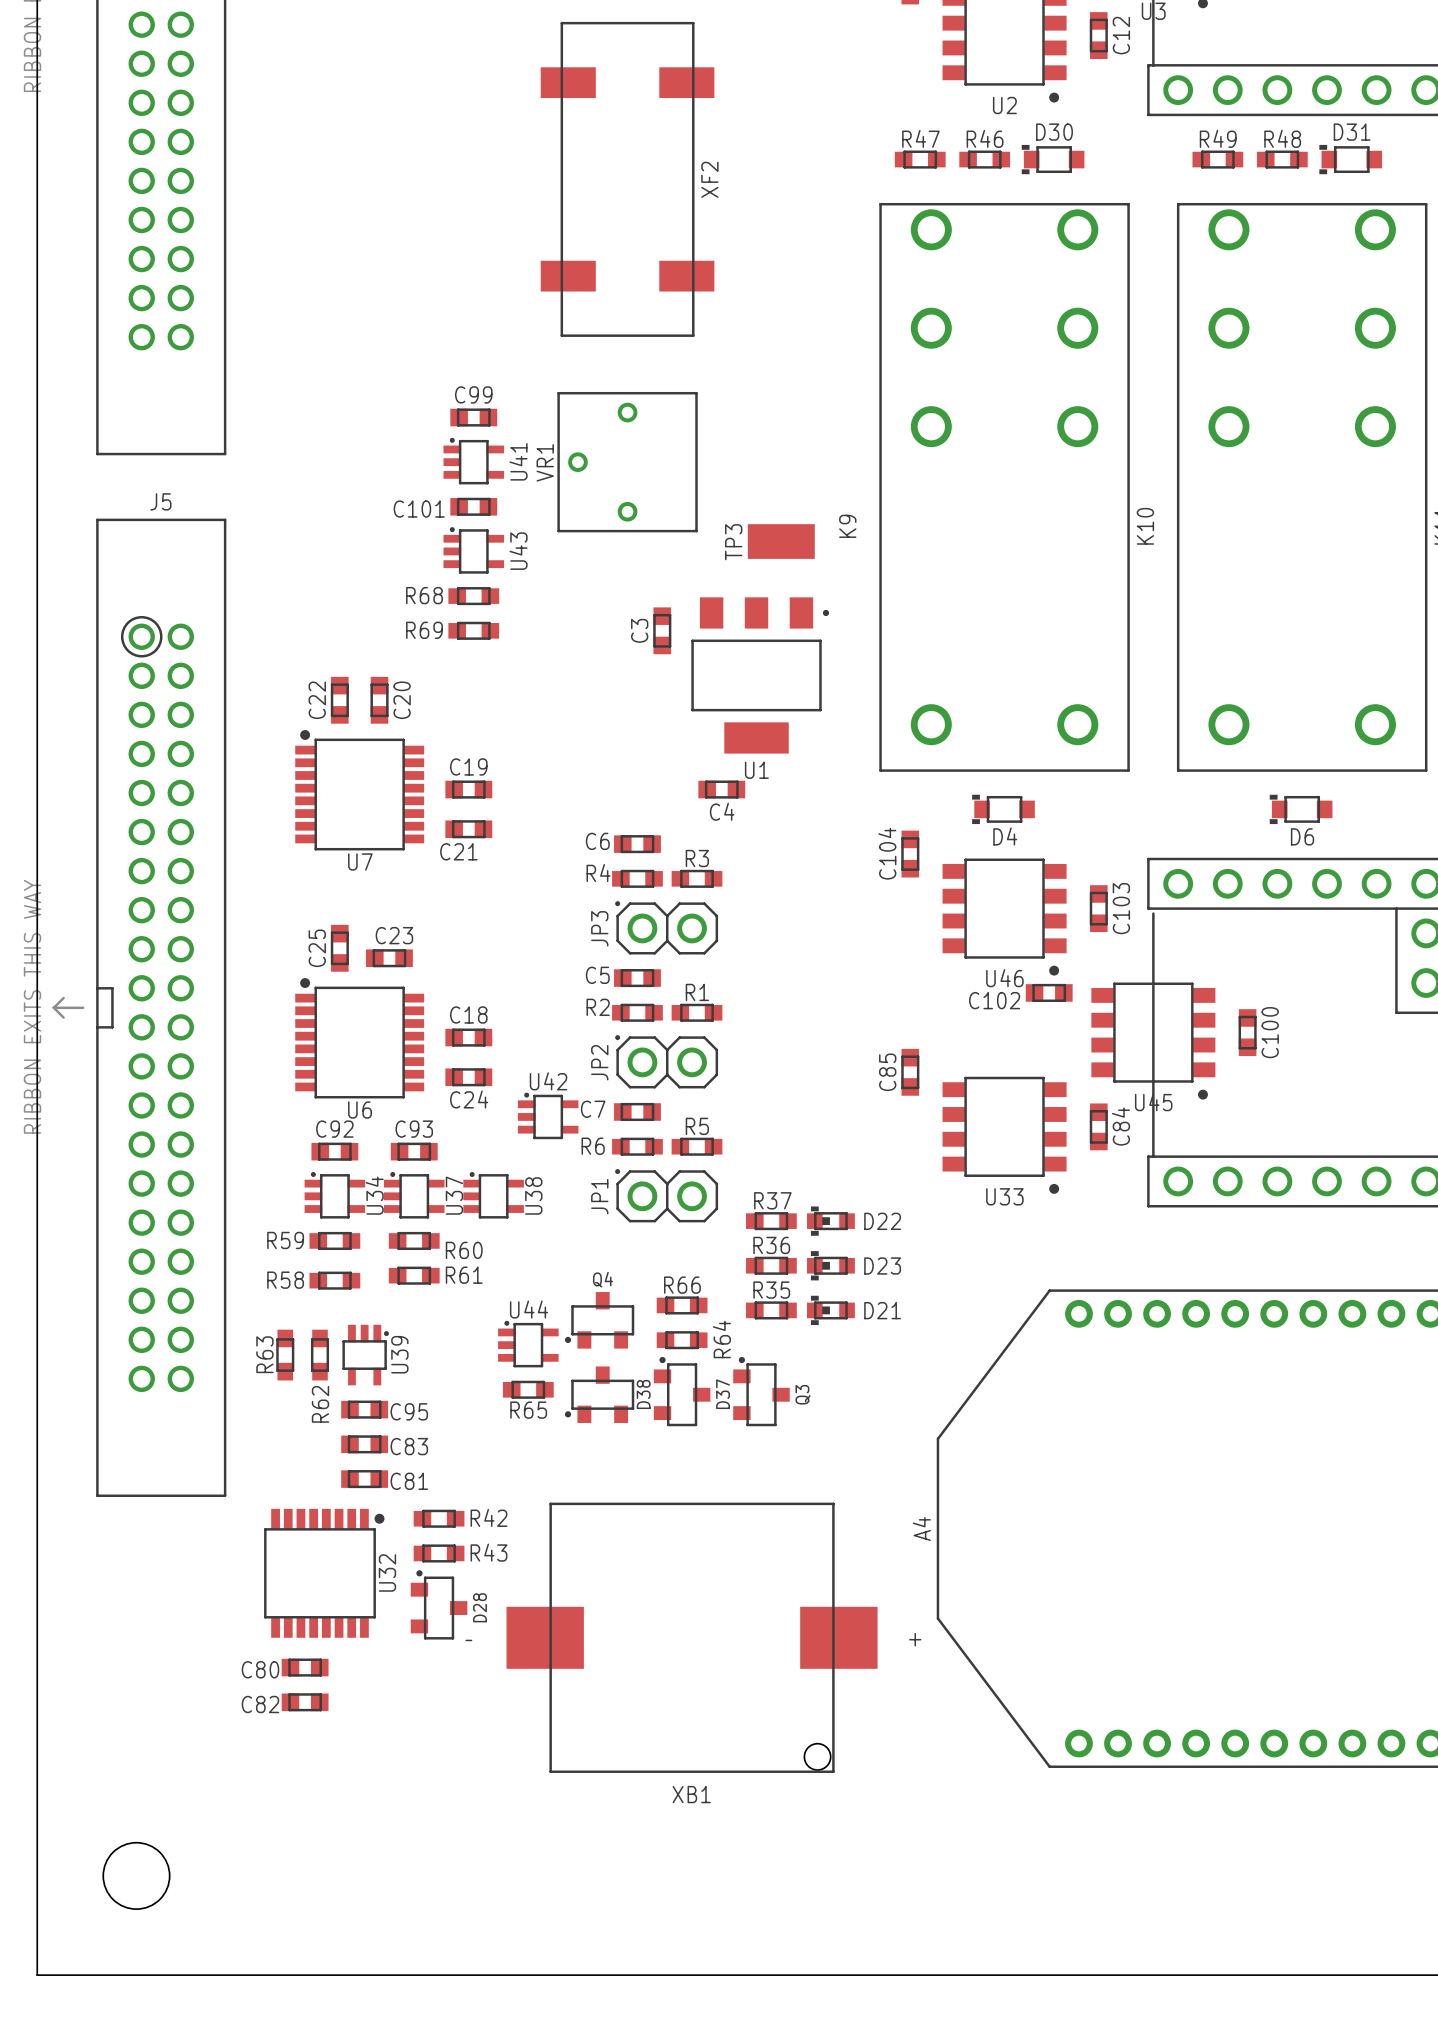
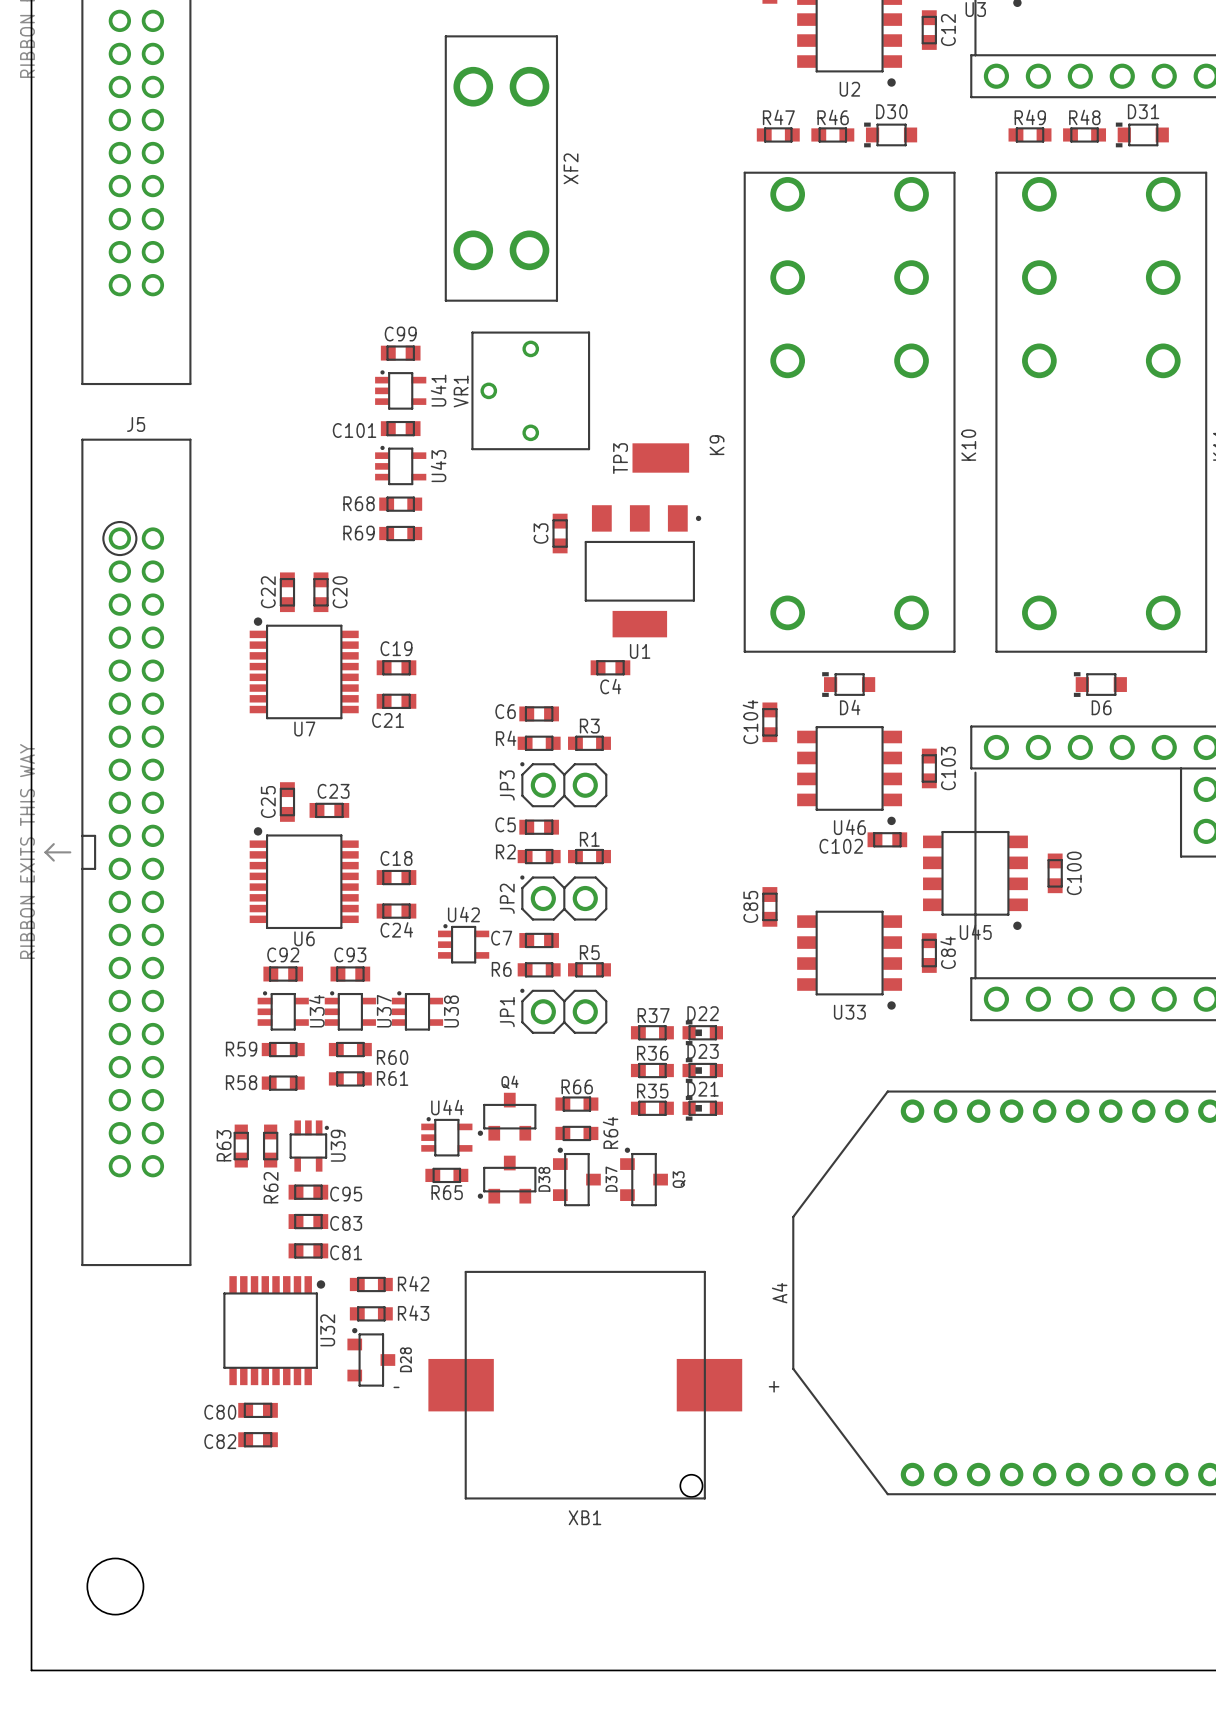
XF2 footprint: [540, 21, 715, 337] -> [444, 35, 559, 302]
D22 name position: D22 (882, 1221) -> D22 (703, 1013)
D23 name position: D23 (882, 1266) -> D23 (703, 1051)
D21 name position: D21 (882, 1310) -> D21 (703, 1089)

